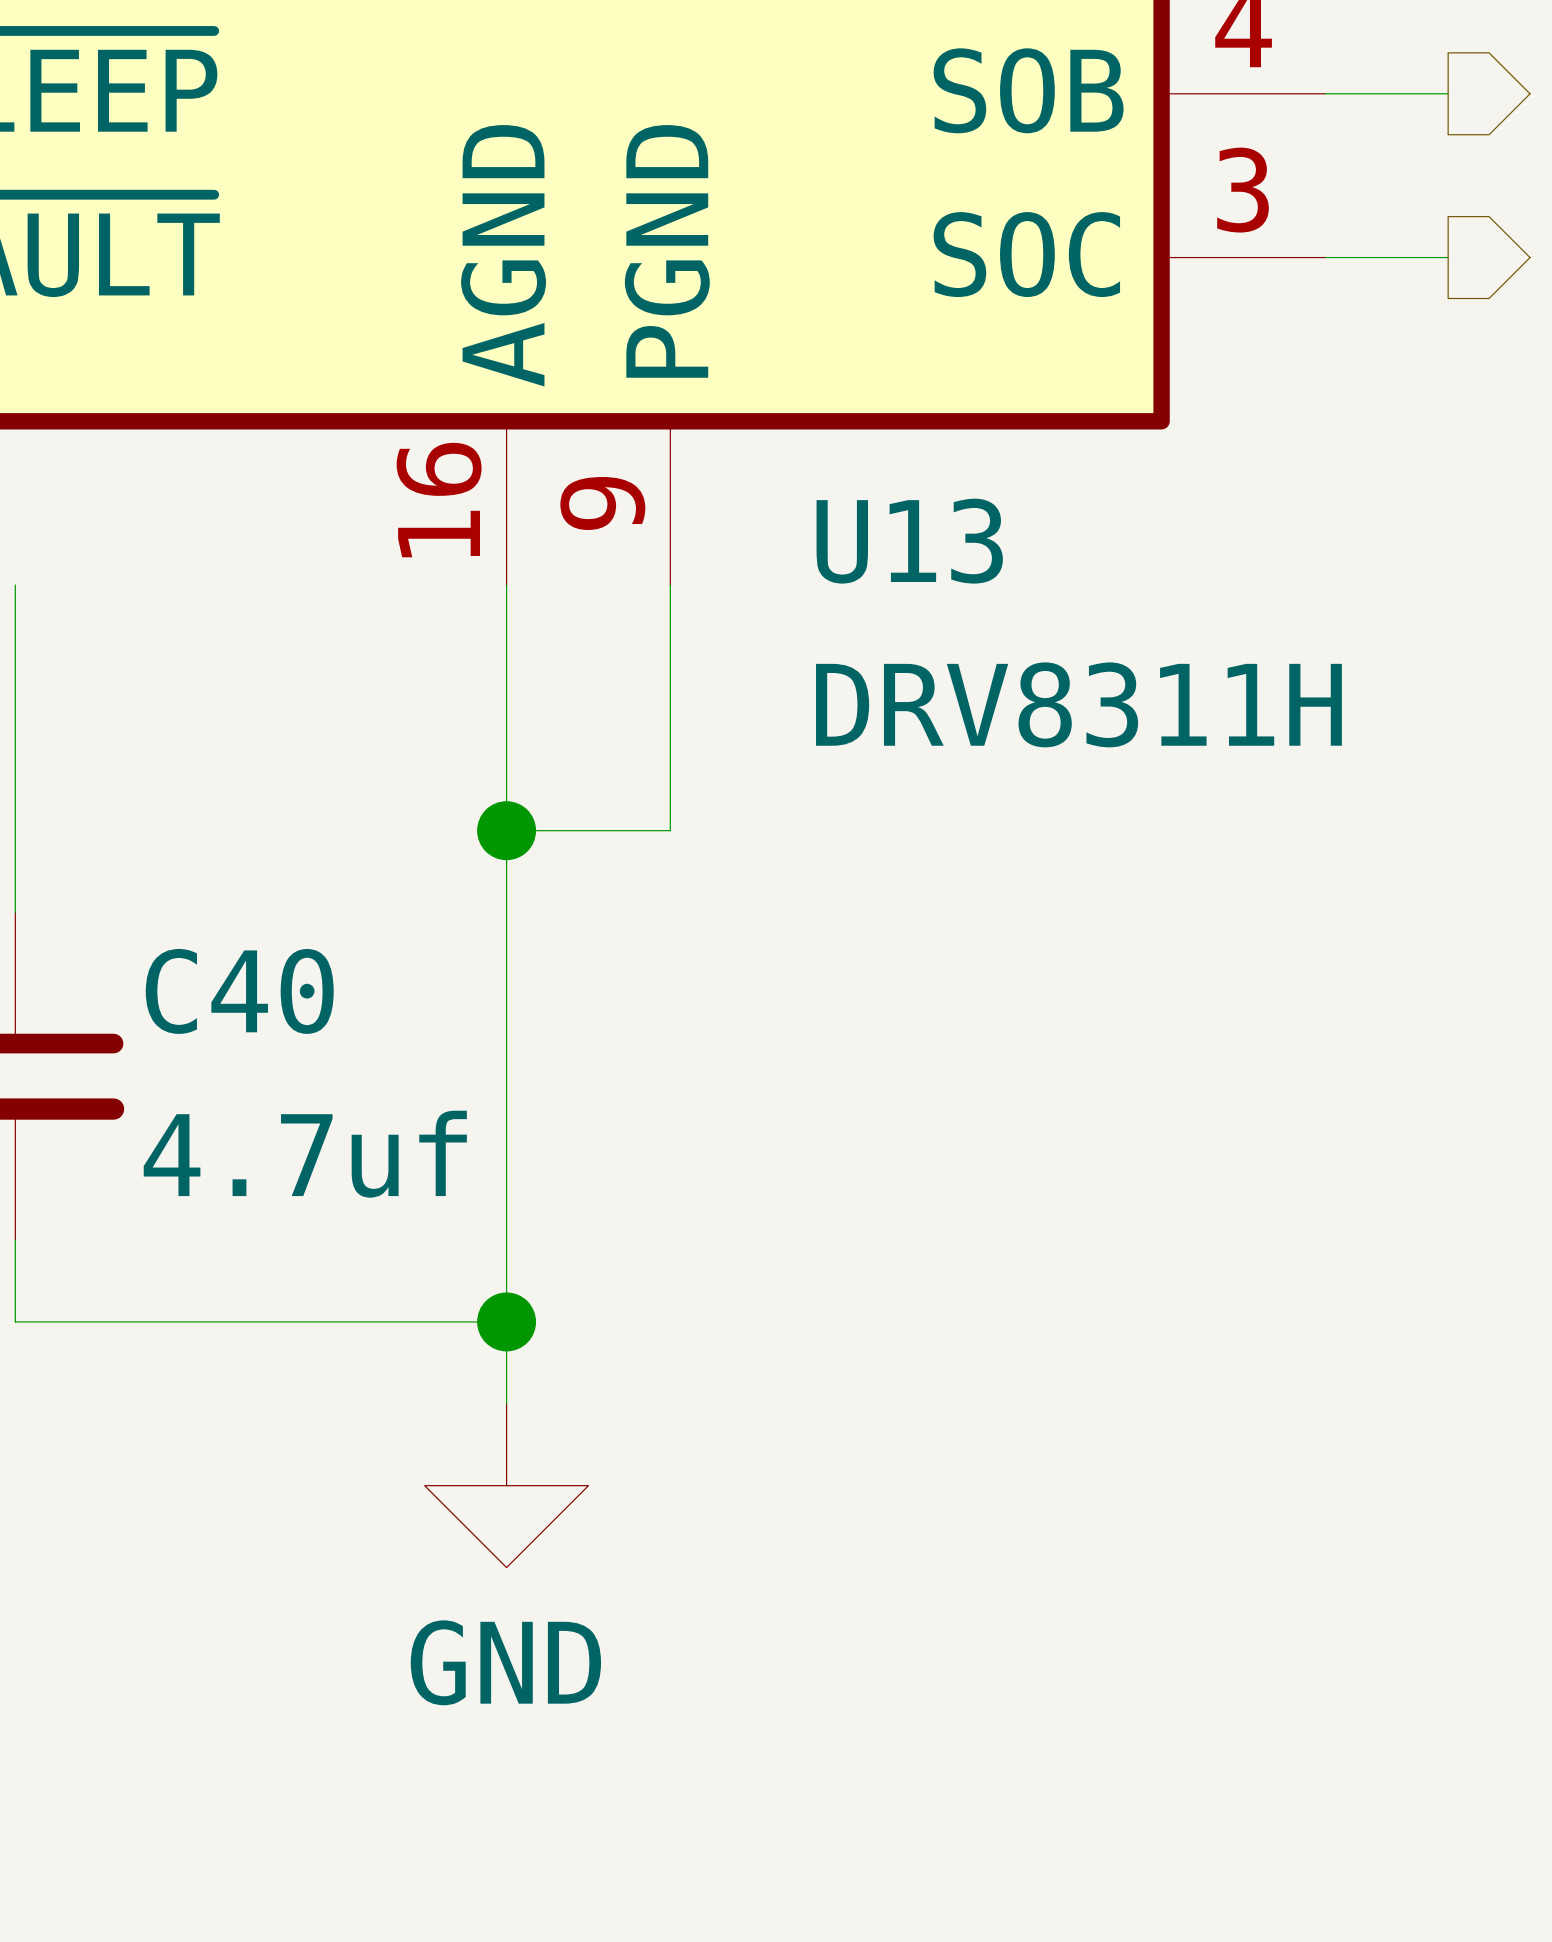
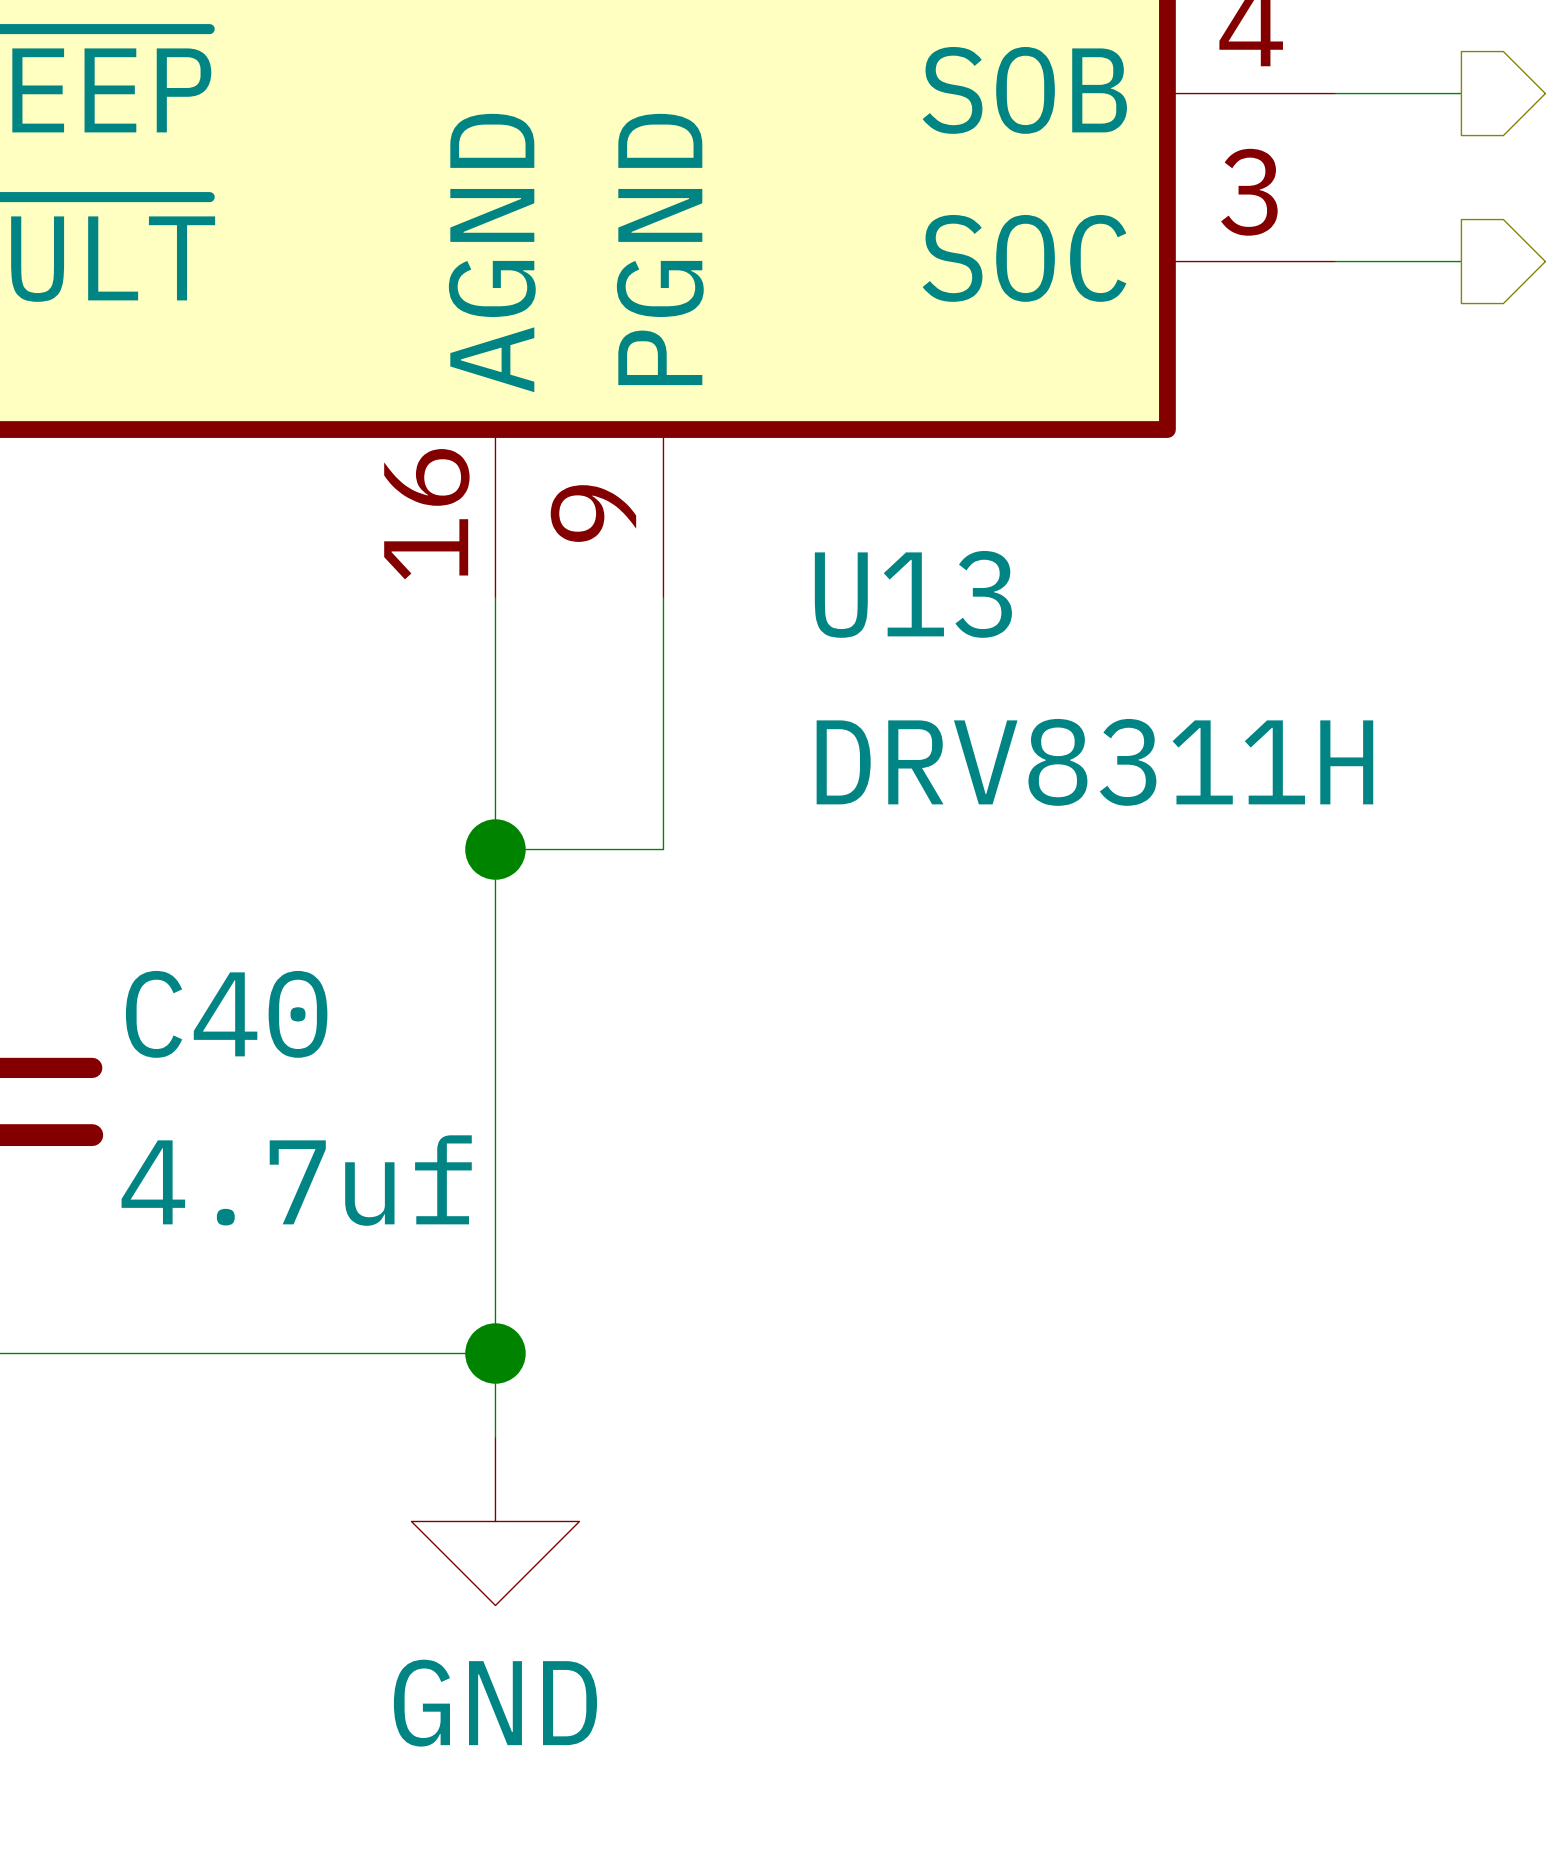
U13 name position: U13 (909, 541) -> U13 (913, 594)
U13 value position: DRV8311H (1078, 704) -> DRV8311H (1094, 762)

